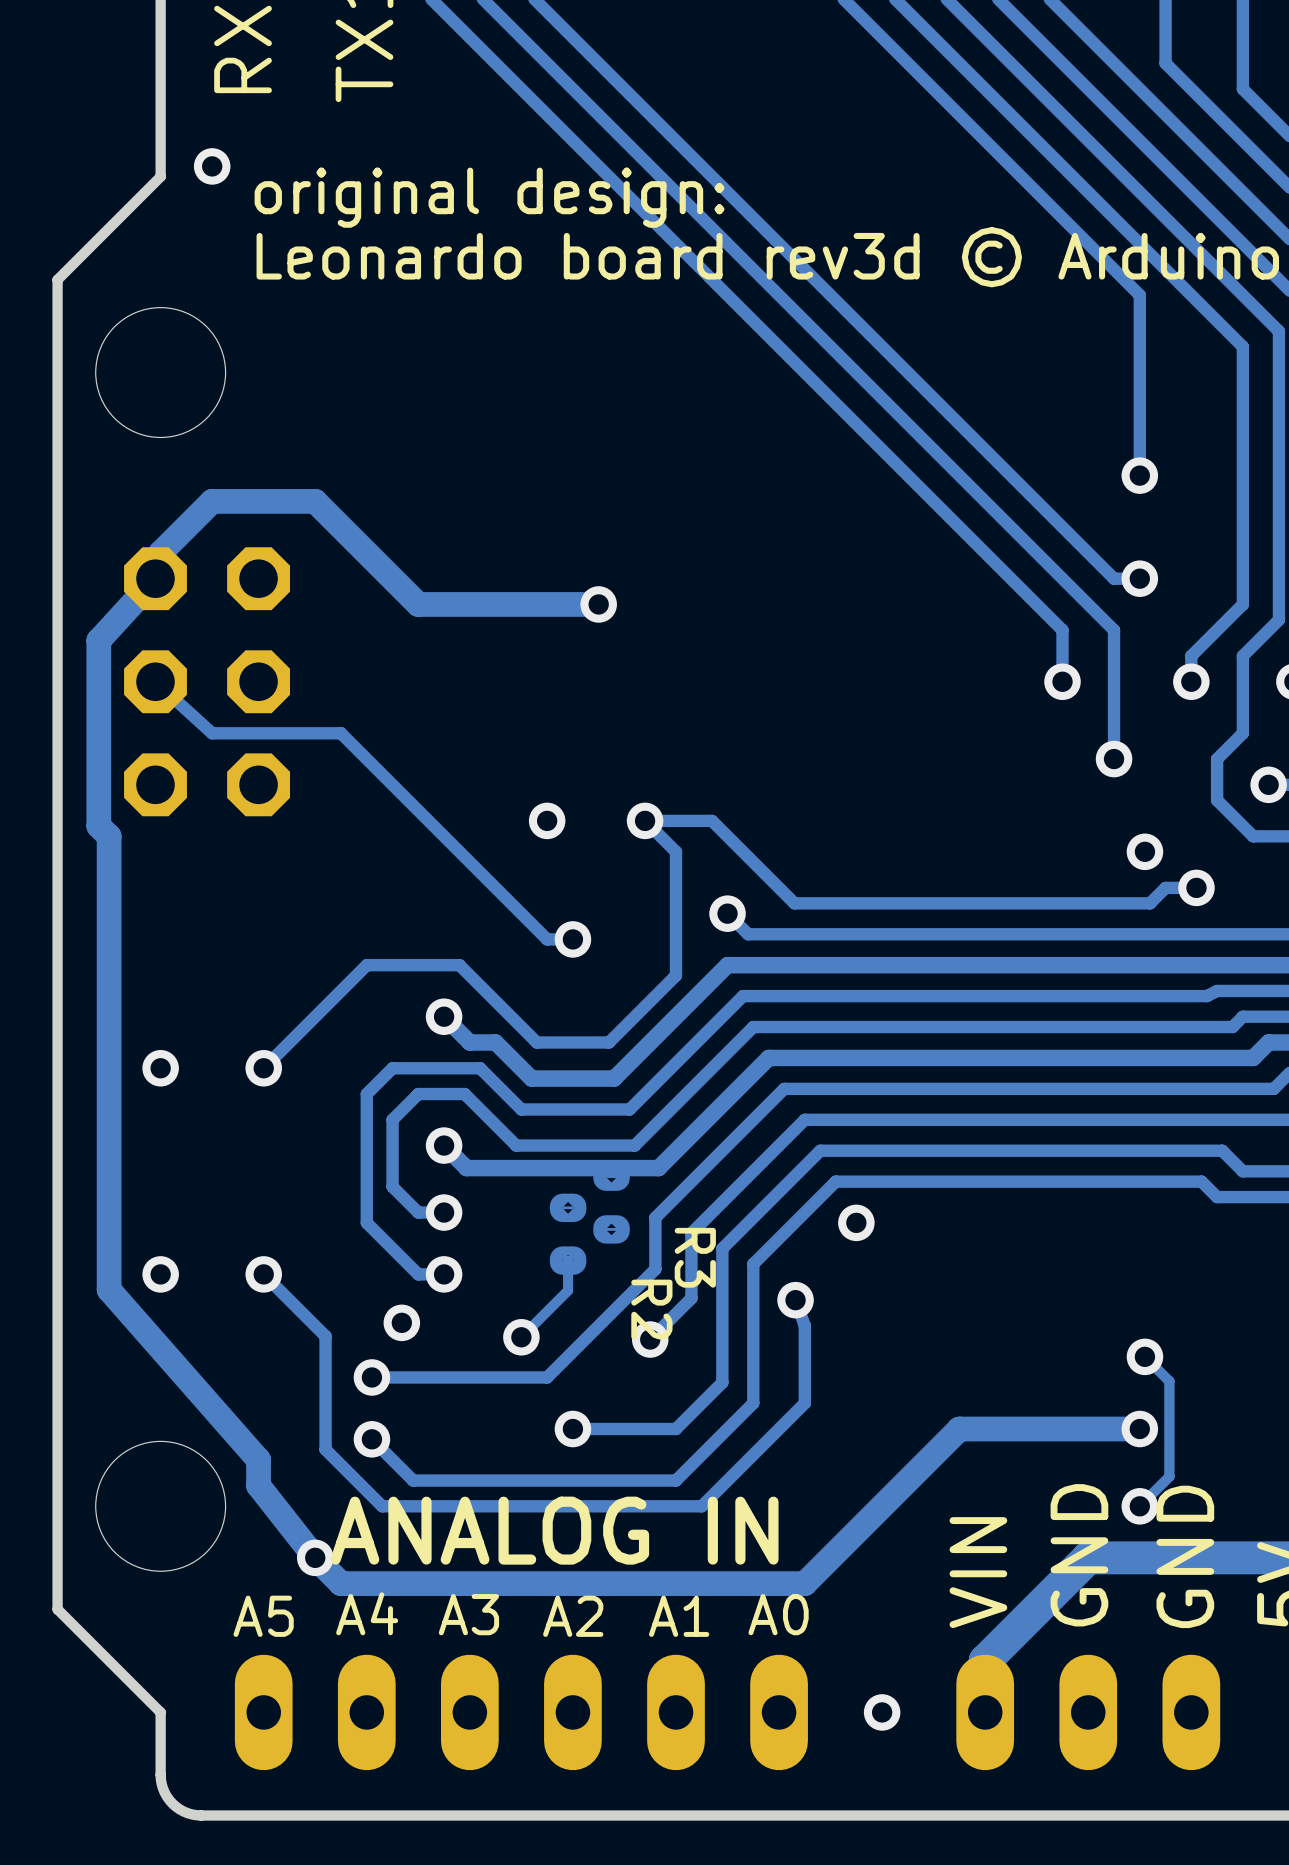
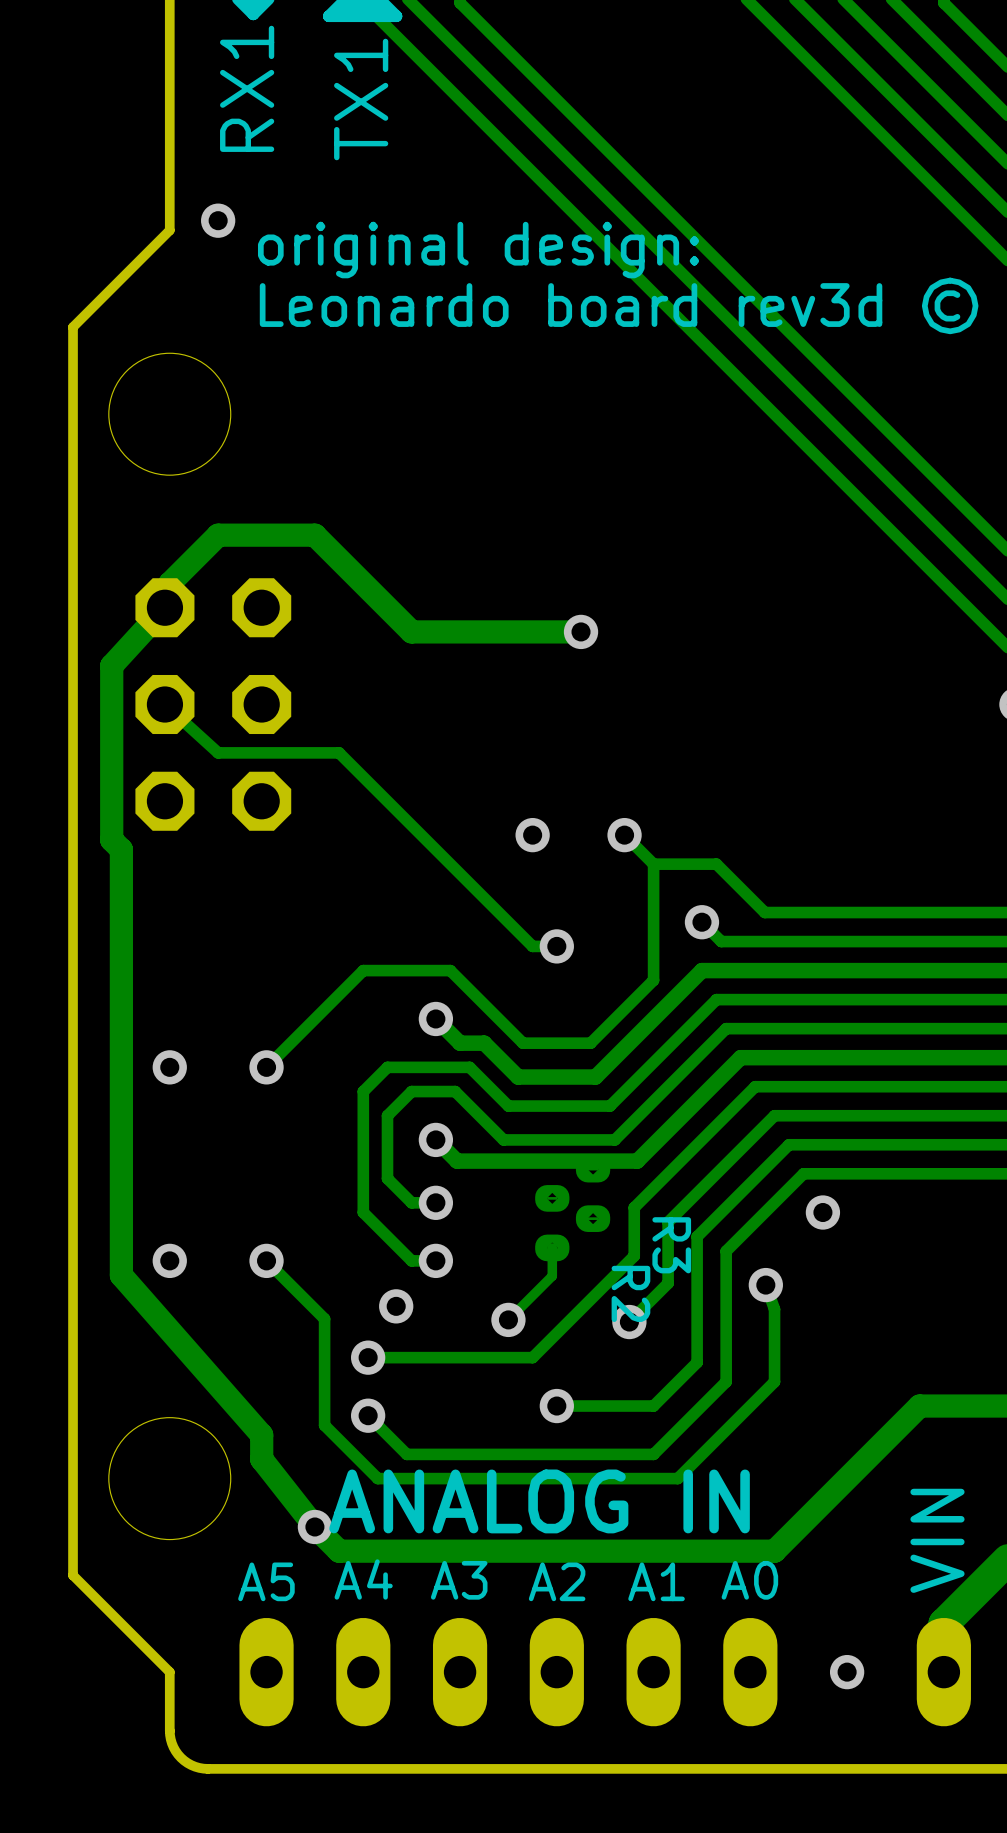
track: (645, 820) (712, 820) (742, 851) -> (653, 864) (716, 864)

